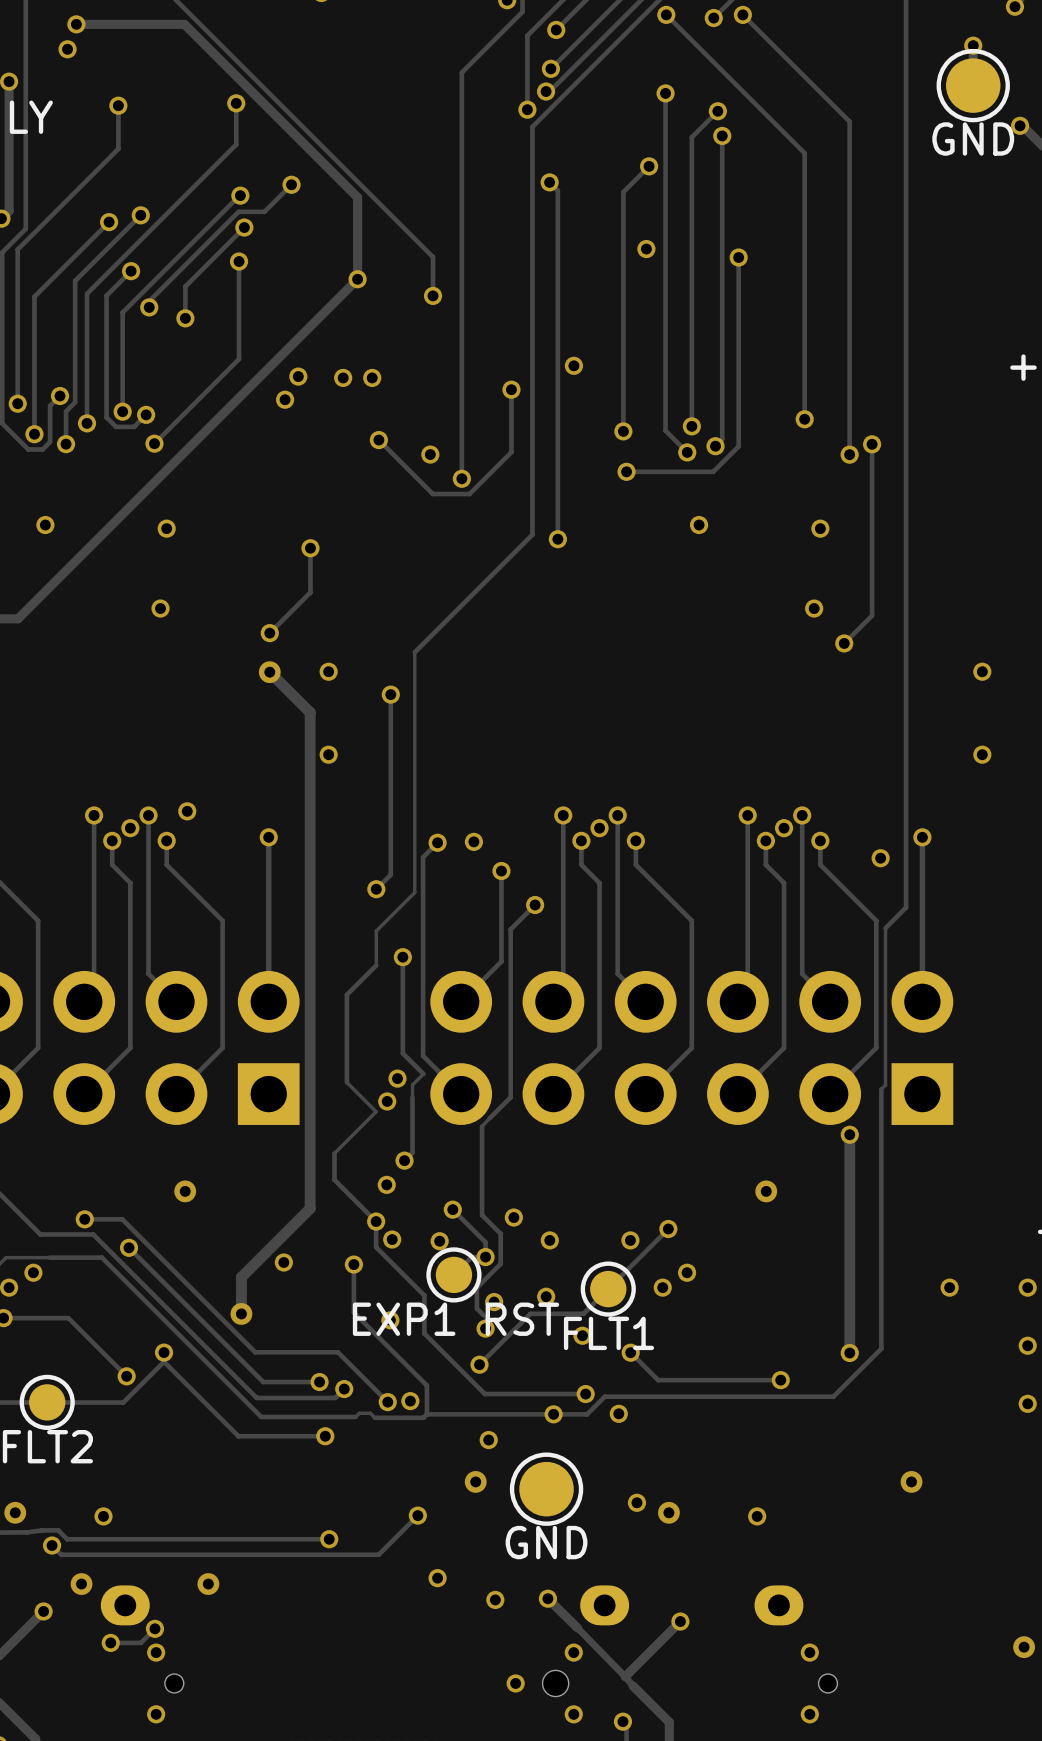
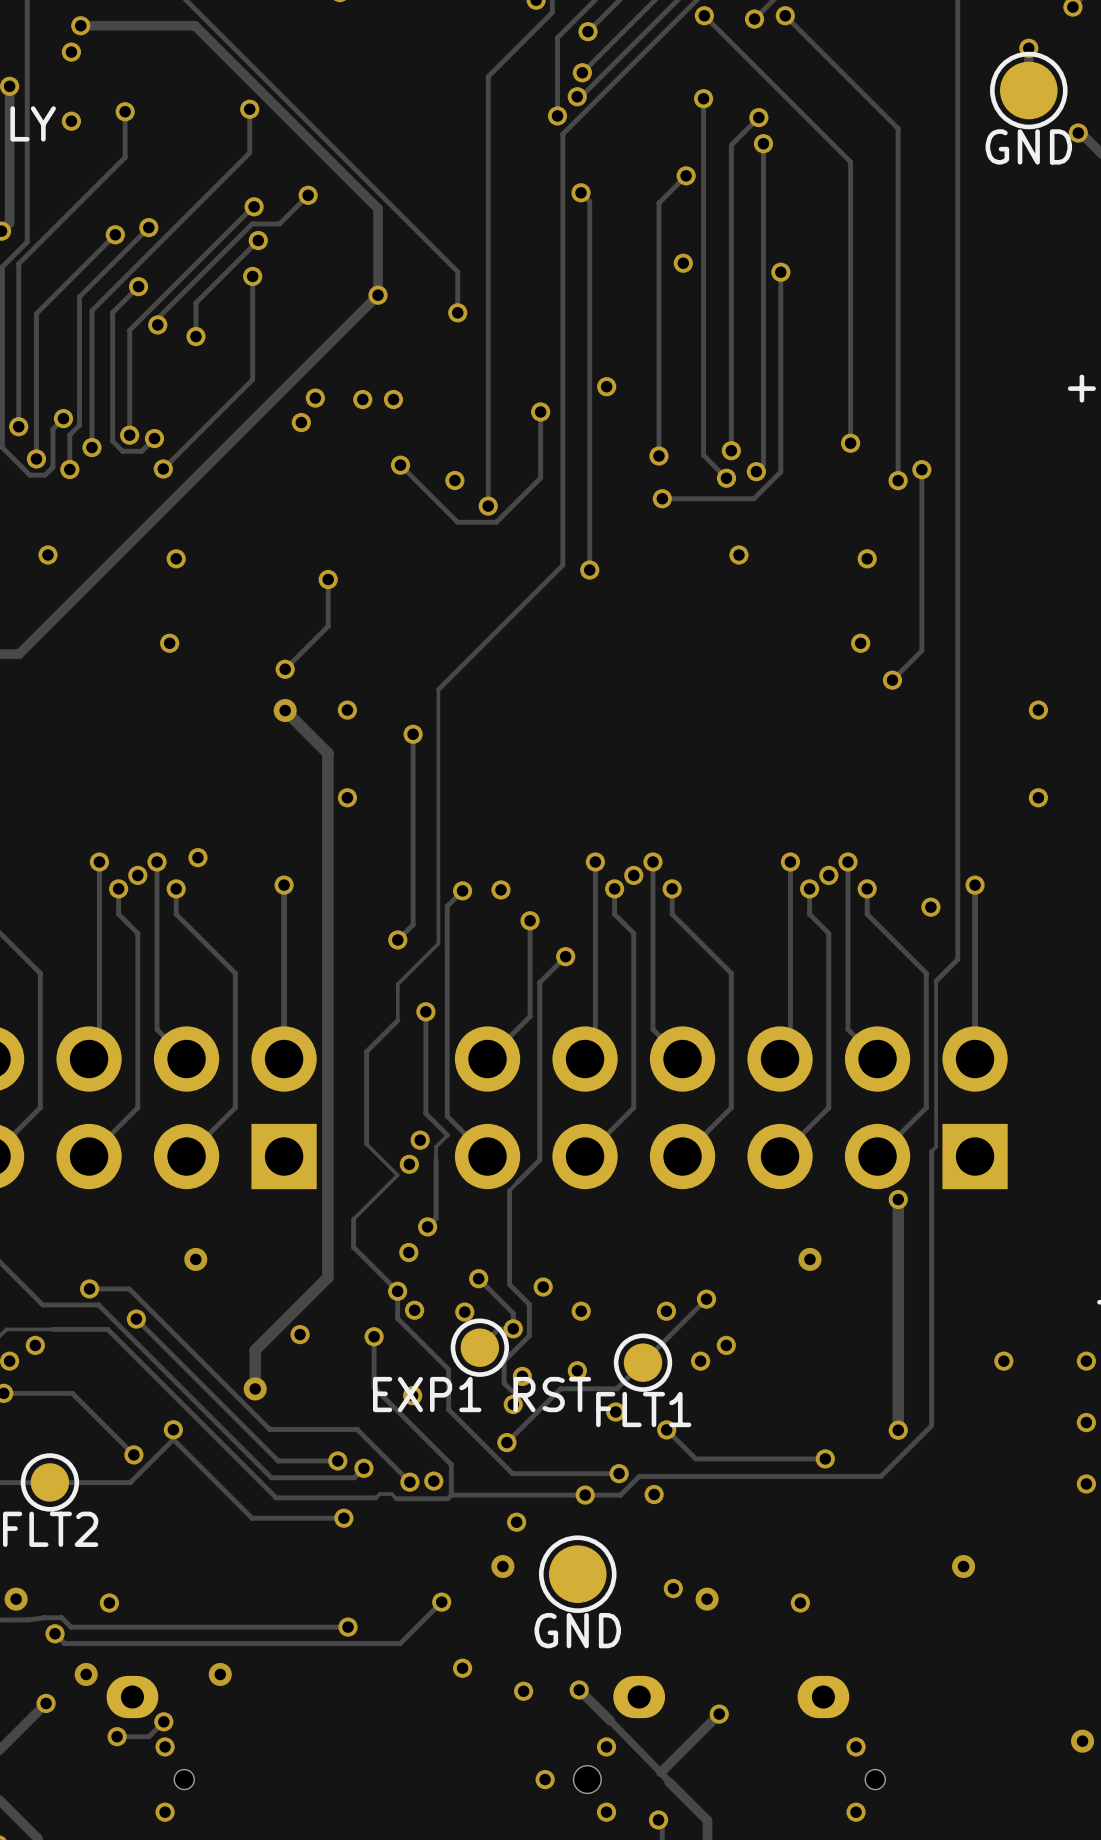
via: none -> (71, 121)

